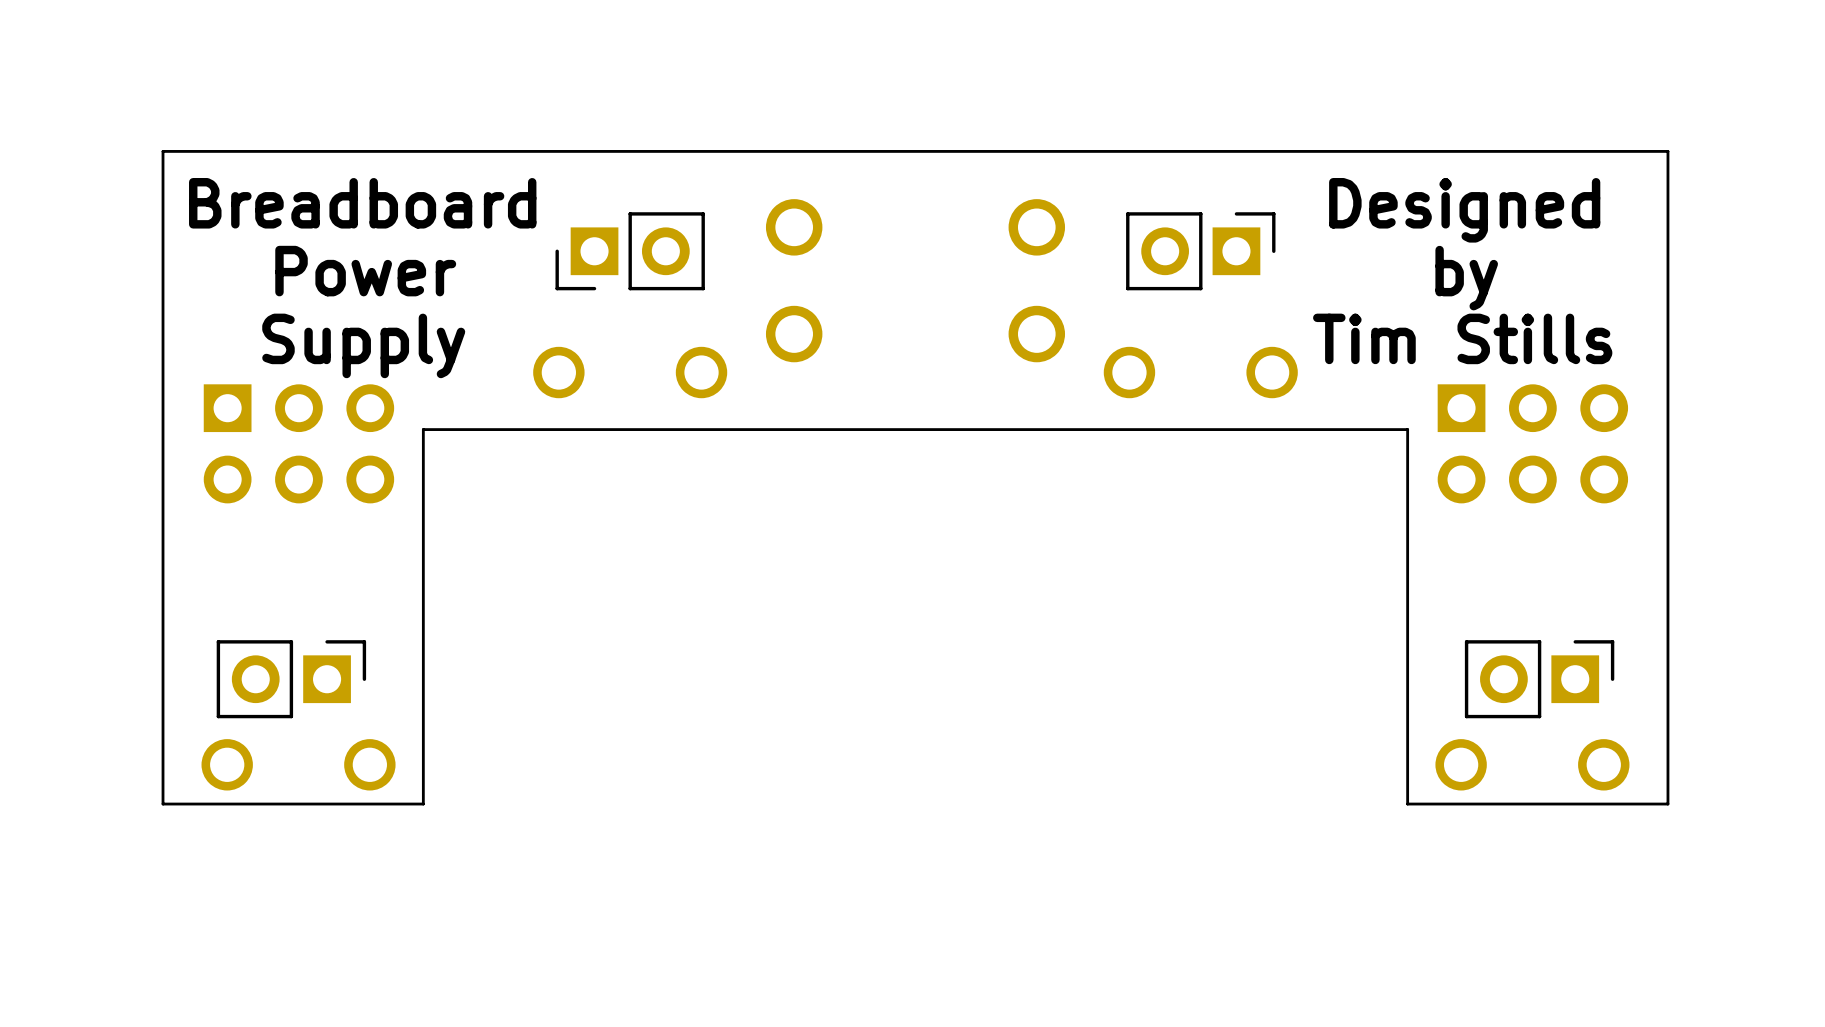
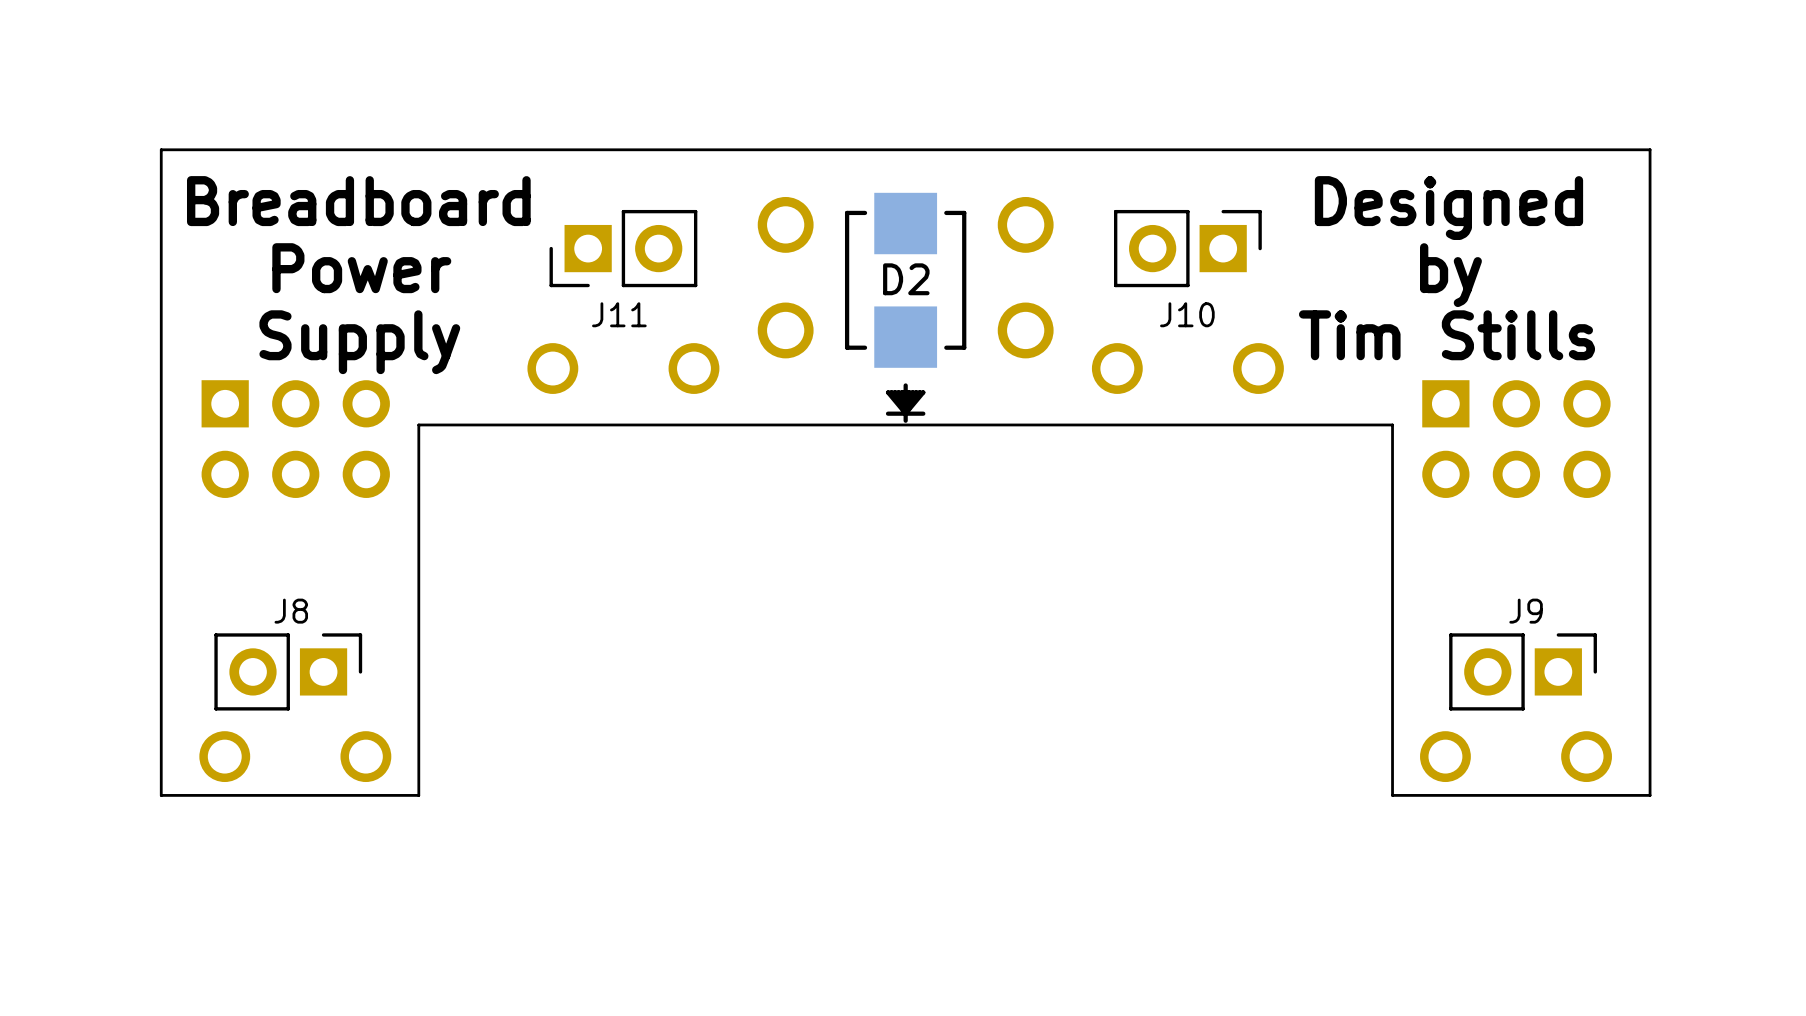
D2: none -> (905, 307)
J11 name: none -> J11 (619, 314)
J10 name: none -> J10 (1187, 314)
J8 name: none -> J8 (291, 611)
J9 name: none -> J9 (1526, 611)

